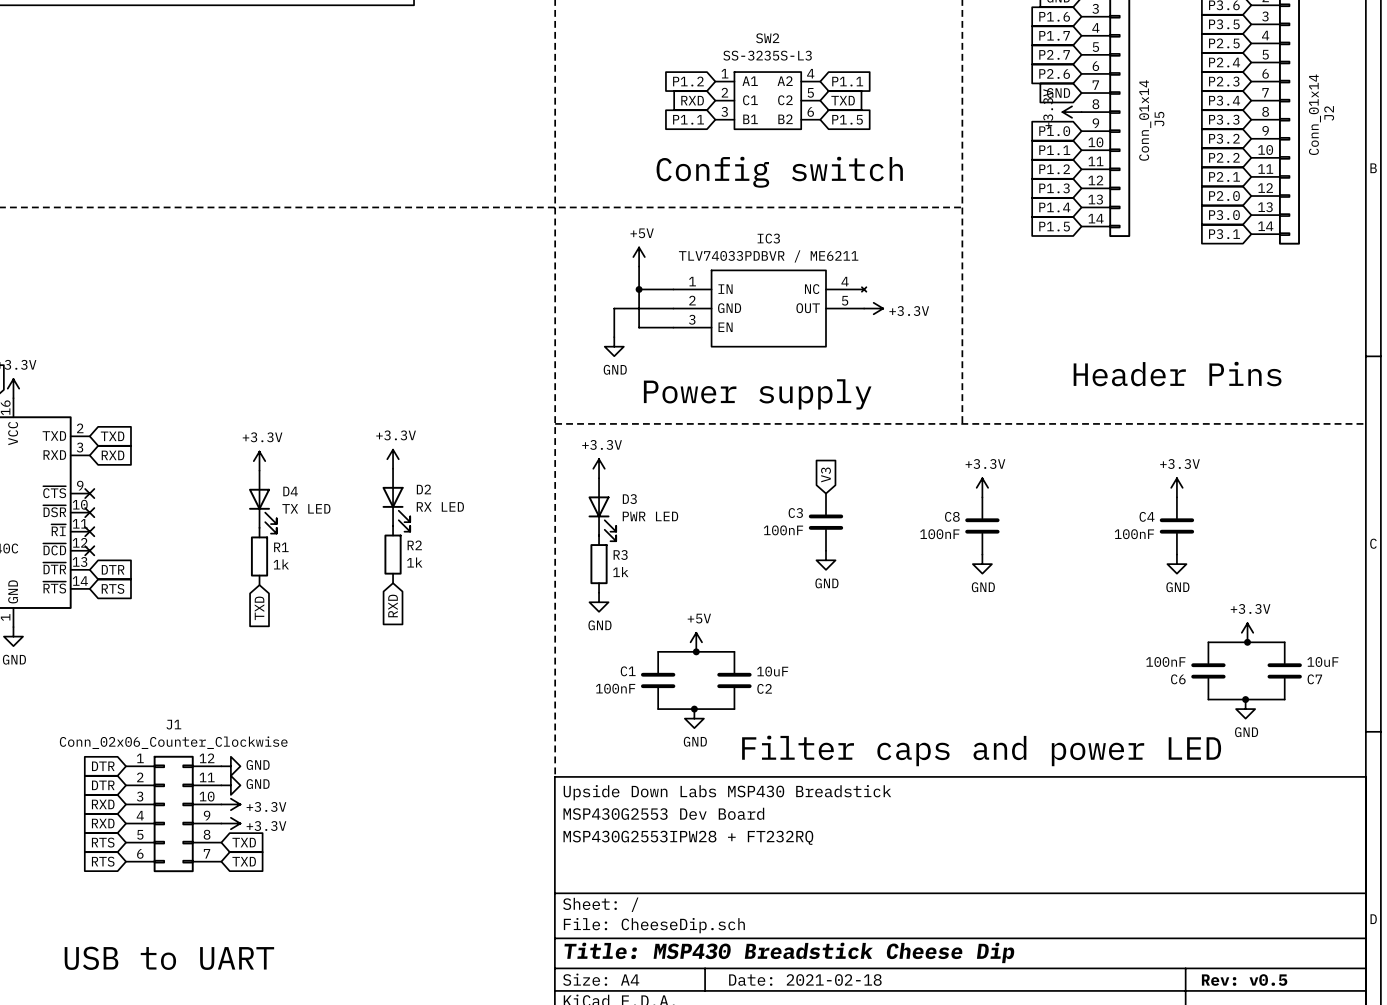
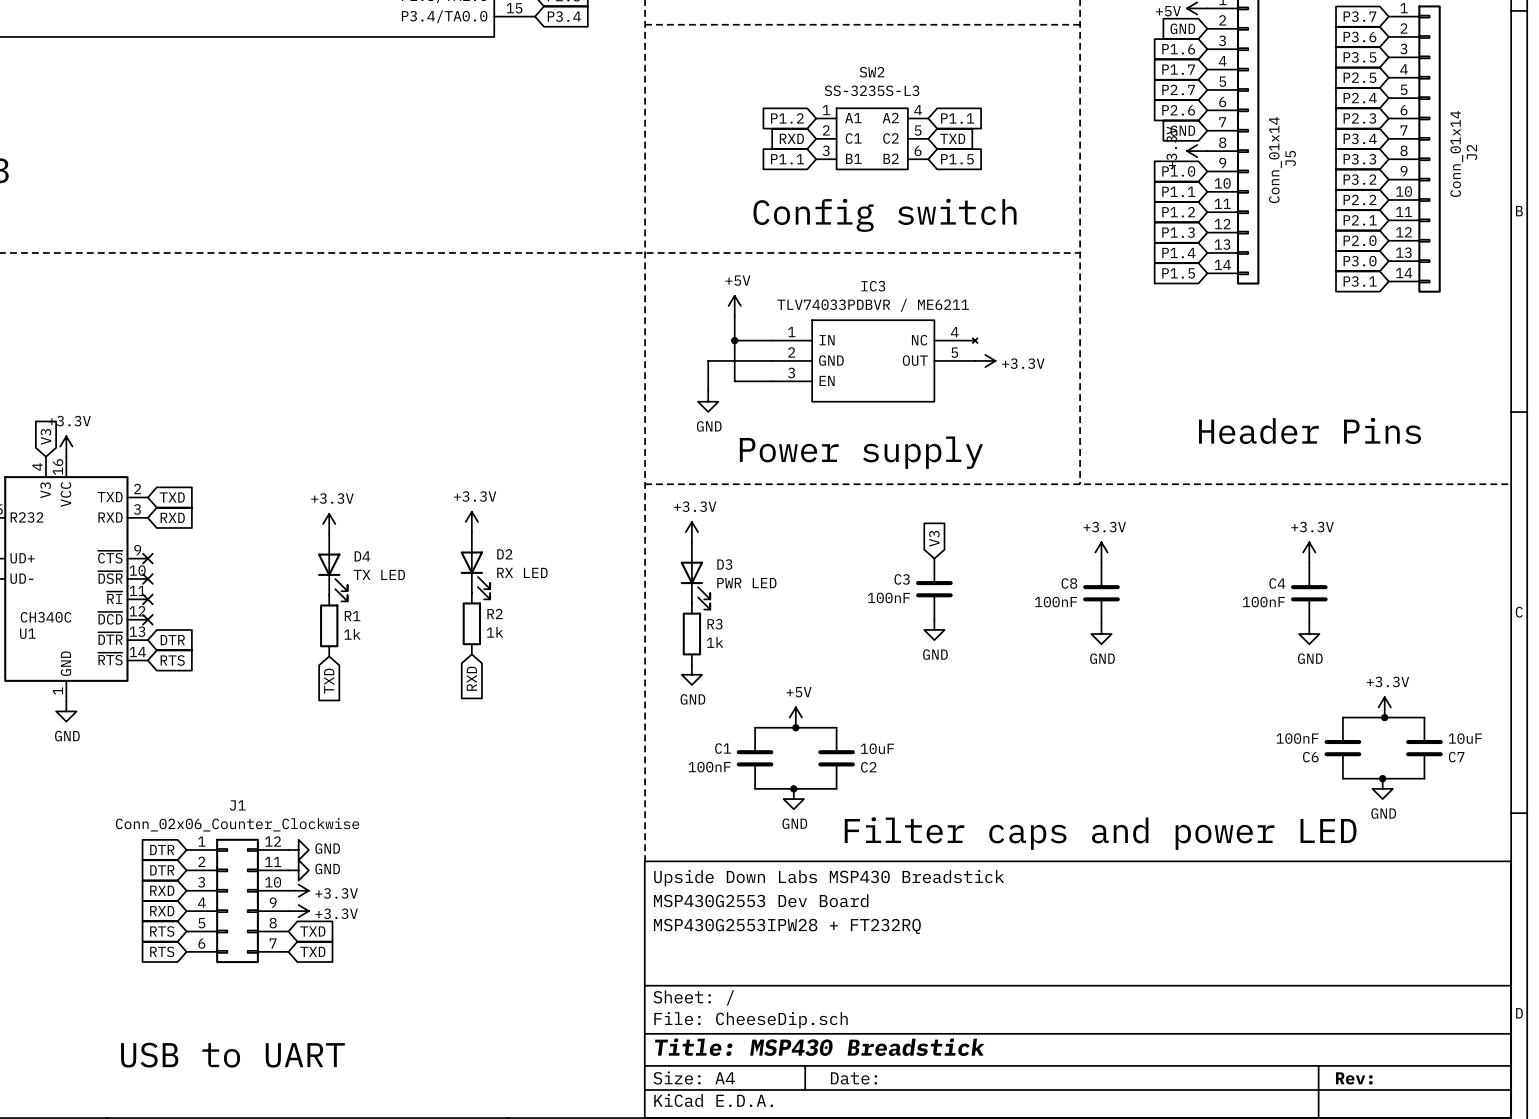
title block: Title: MSP430 Breadstick Cheese Dip (789, 952) -> Title: MSP430 Breadstick (819, 1047)
title block: Date: 2021-02-18 (805, 980) -> Date: (854, 1078)
title block: Rev: v0.5 (1244, 980) -> Rev: (1354, 1078)

